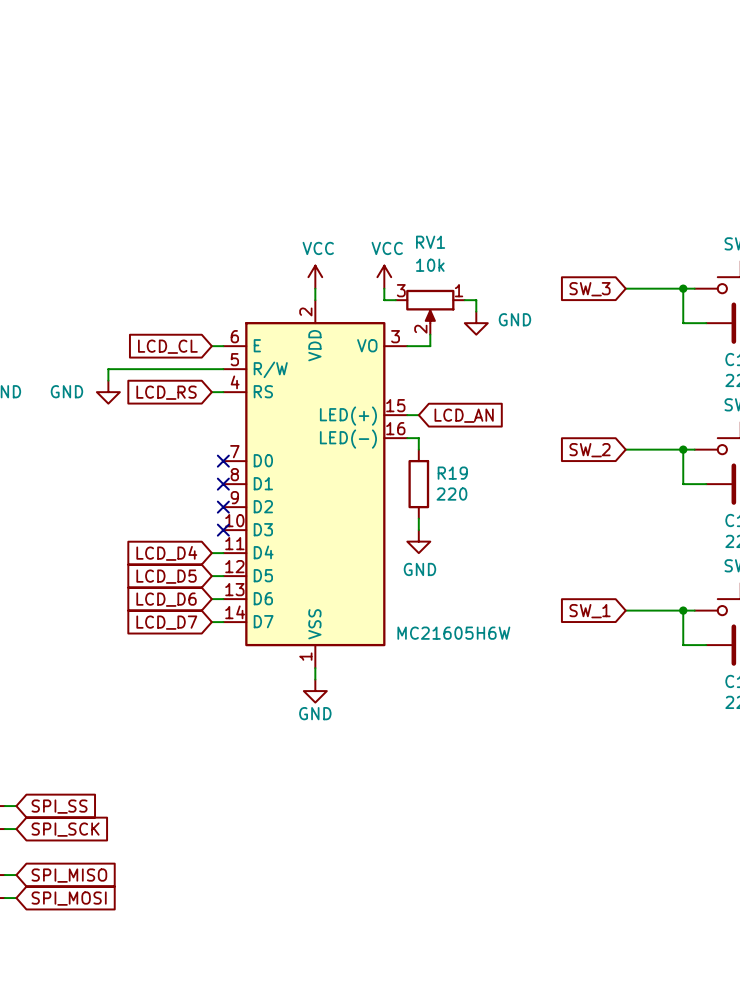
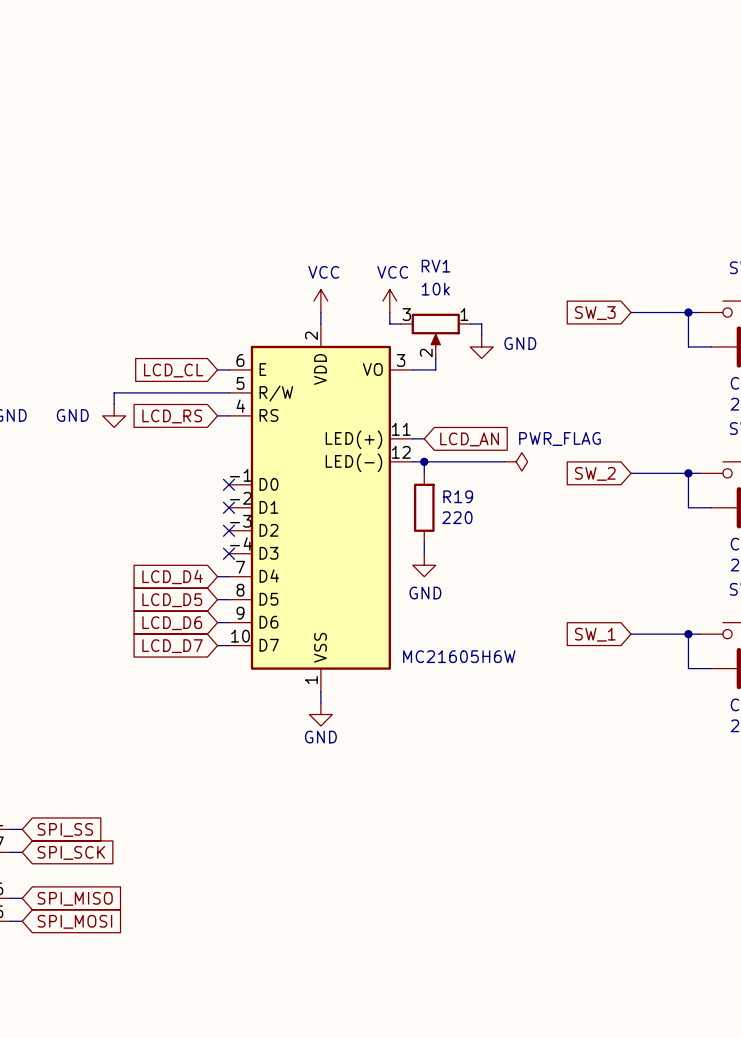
part symbol: [223, 300, 408, 669] -> [229, 324, 413, 692]
wire: none -> (424, 461) (504, 461)
junction: none -> (424, 461)
power symbol: none -> PWR_FLAG (516, 461)

